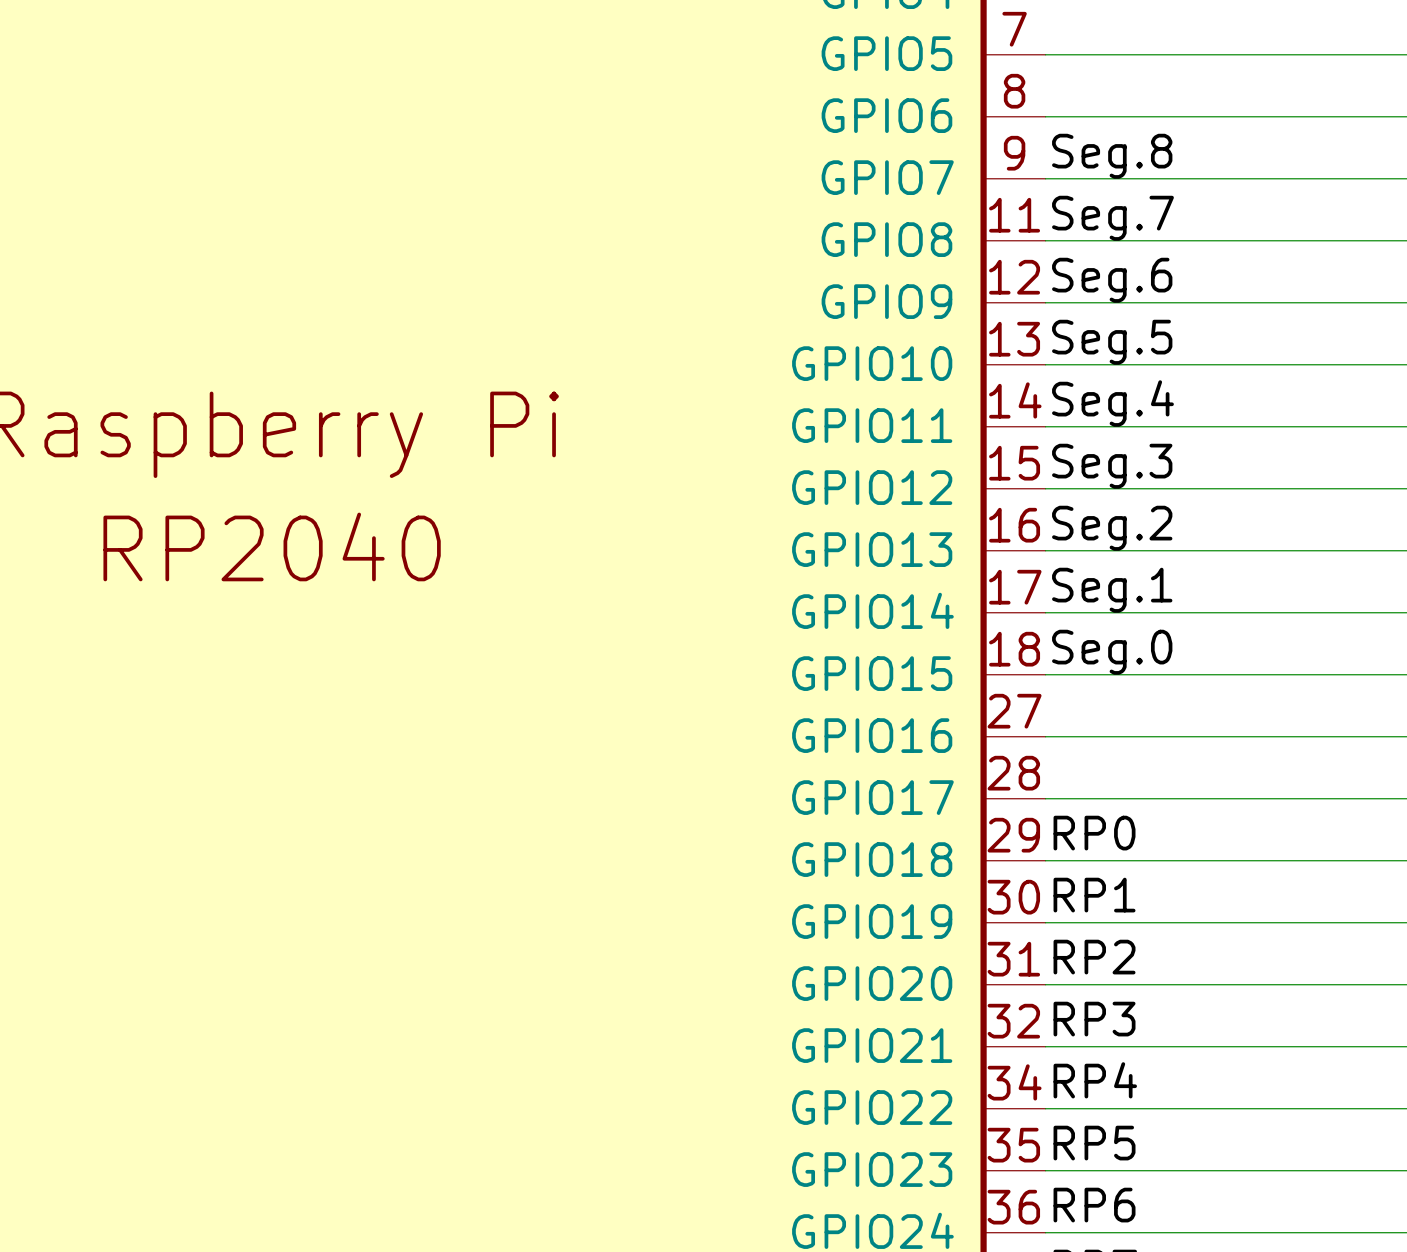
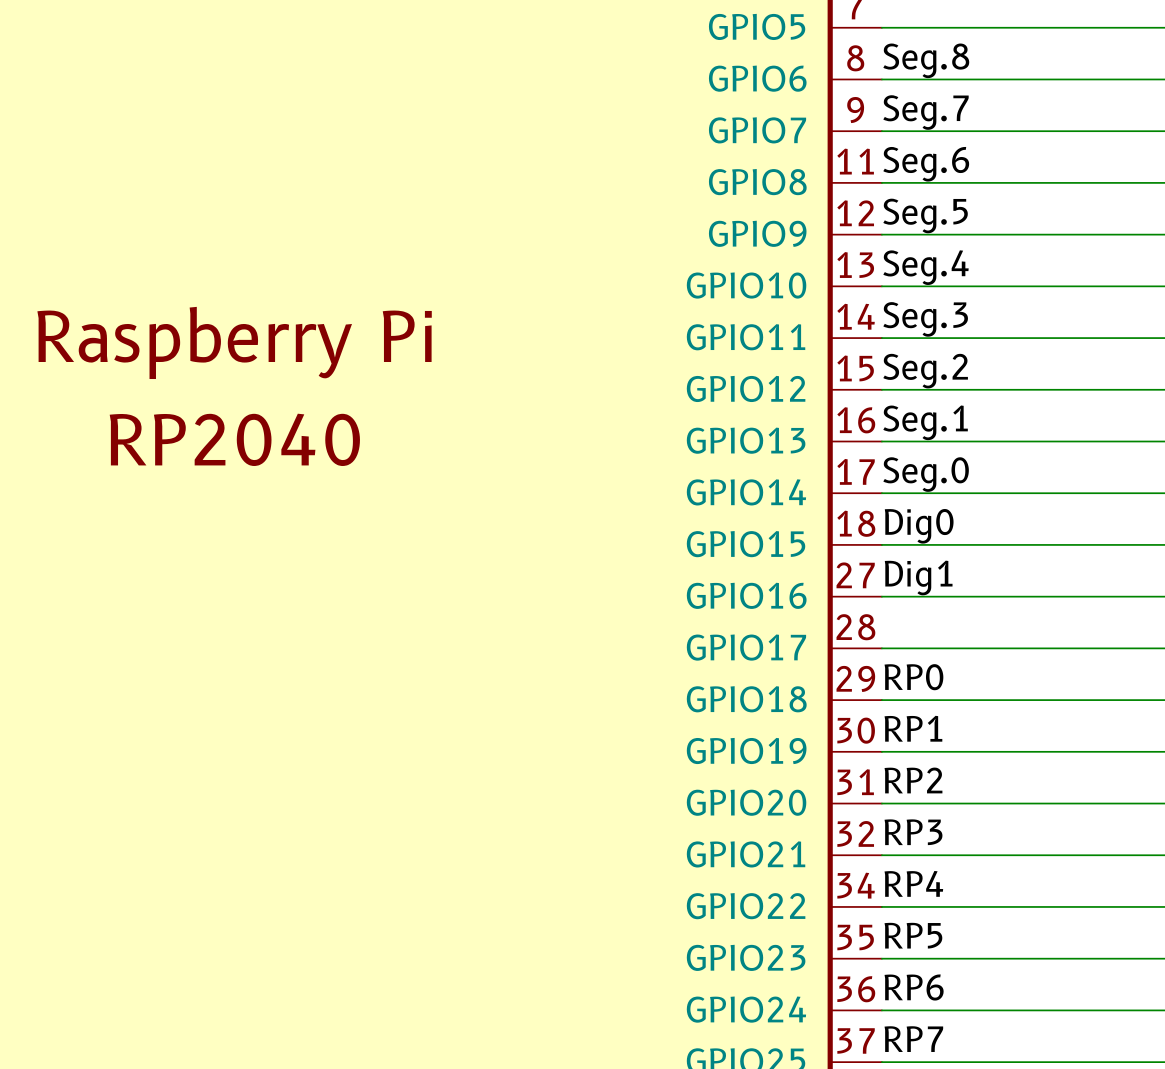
label: none -> Seg.8 (926, 60)
label: Seg.8 (1112, 156) -> Seg.7 (925, 112)
label: Seg.7 (1112, 218) -> Seg.6 (926, 164)
label: Seg.6 (1112, 280) -> Seg.5 (925, 215)
label: Seg.5 (1112, 342) -> Seg.4 (925, 267)
label: Seg.4 (1112, 403) -> Seg.3 (925, 319)
label: Seg.3 (1112, 466) -> Seg.2 (925, 371)
label: Seg.2 (1112, 528) -> Seg.1 (925, 422)
label: Seg.1 (1112, 590) -> Seg.0 (926, 474)
label: Seg.0 (1112, 652) -> Dig0 (919, 526)
label: none -> Dig1 (918, 577)

